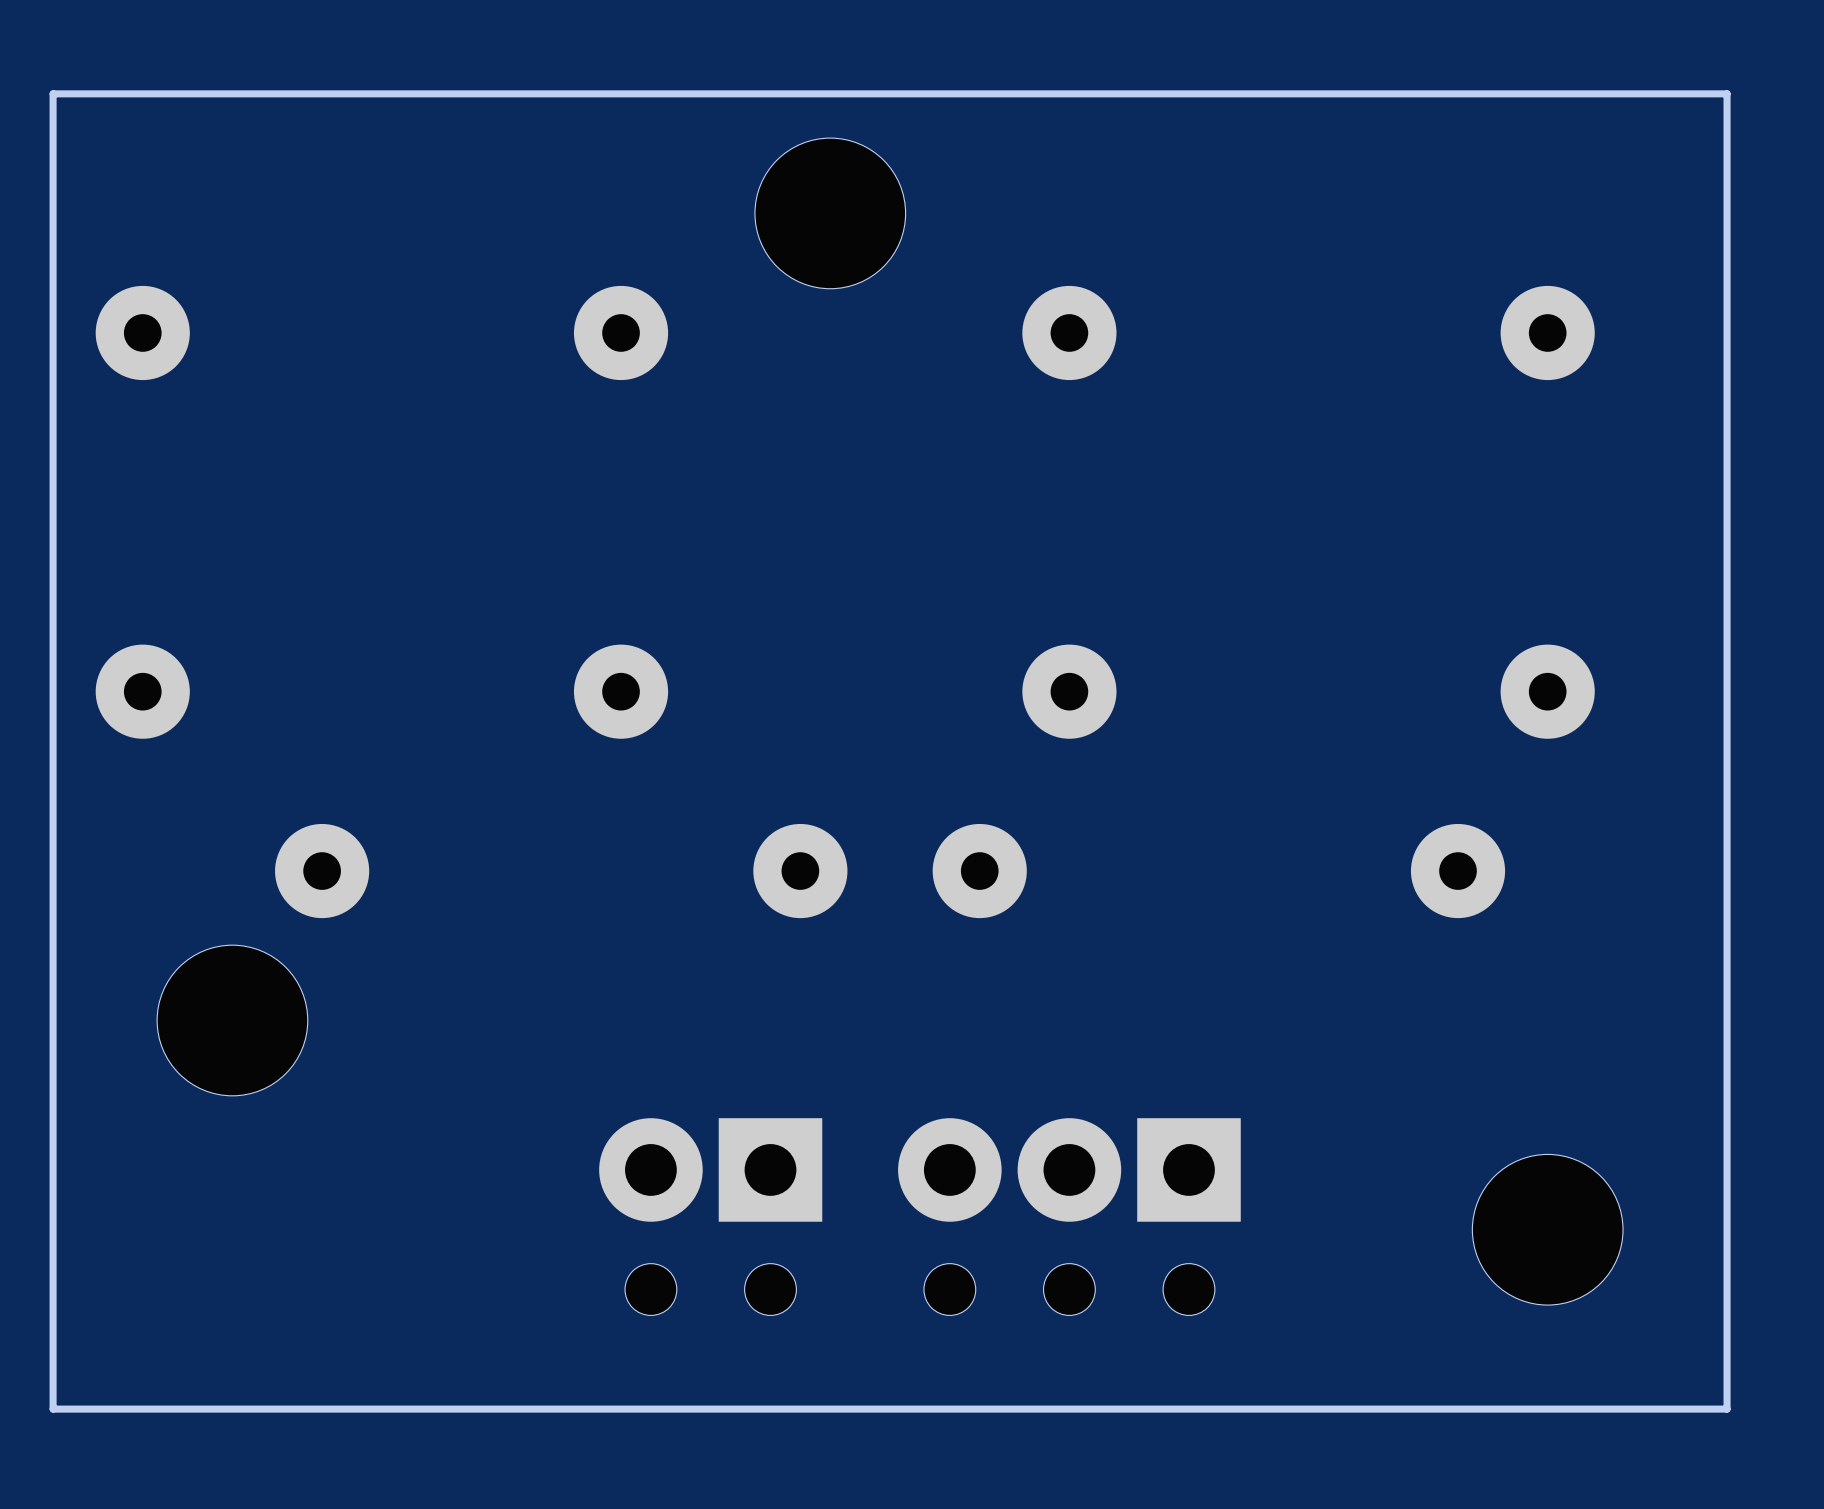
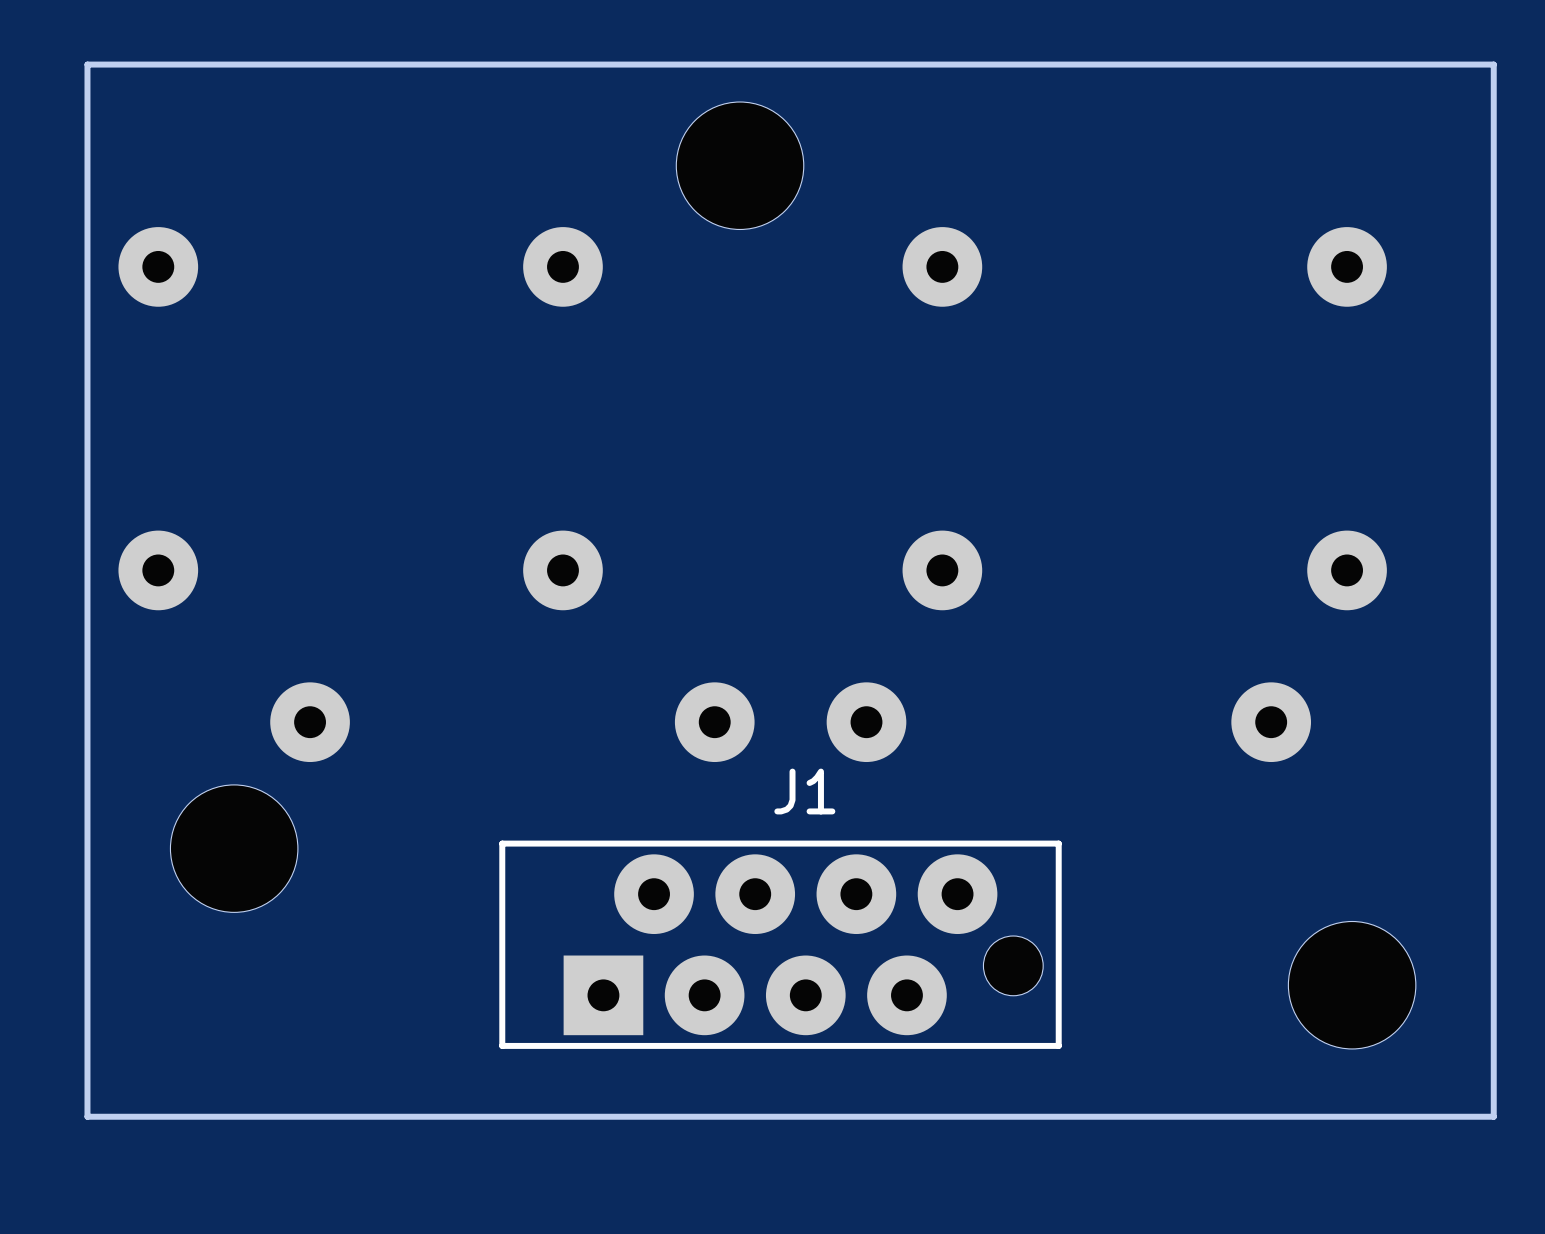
board edge: (1721, 93) (1727, 93) (1727, 1409) (53, 1409) (53, 93) (59, 93) -> (1493, 64) (1493, 1116) (87, 1116) (87, 64)
J1: none -> (780, 944)
part: (710, 1216) -> none
part: (1069, 1216) -> none
part position: (1547, 1229) -> (1352, 985)

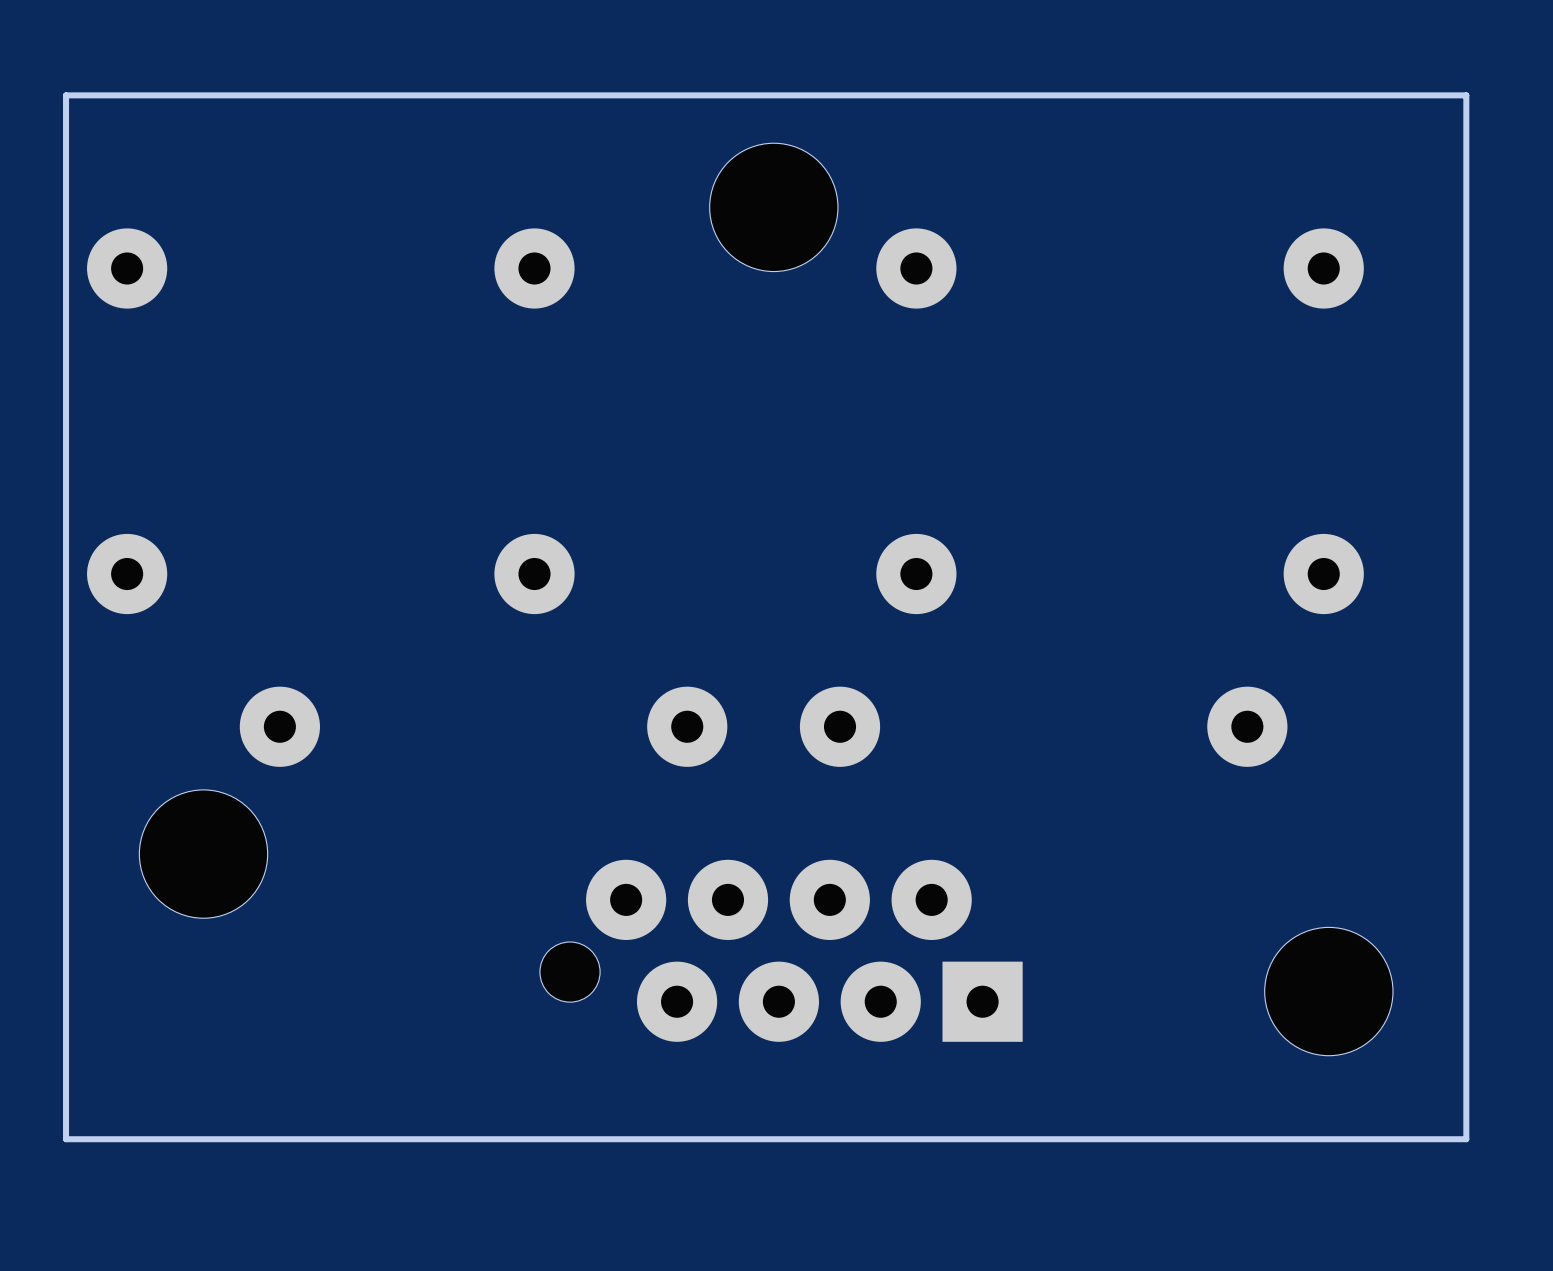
board edge: (1493, 64) (1493, 1116) (87, 1116) (87, 64) (1493, 64) -> (1466, 95) (1466, 1139) (66, 1139) (66, 95) (1466, 95)
part position: (740, 165) -> (773, 207)
J1 side: bottom (780, 944) -> top (781, 950)

